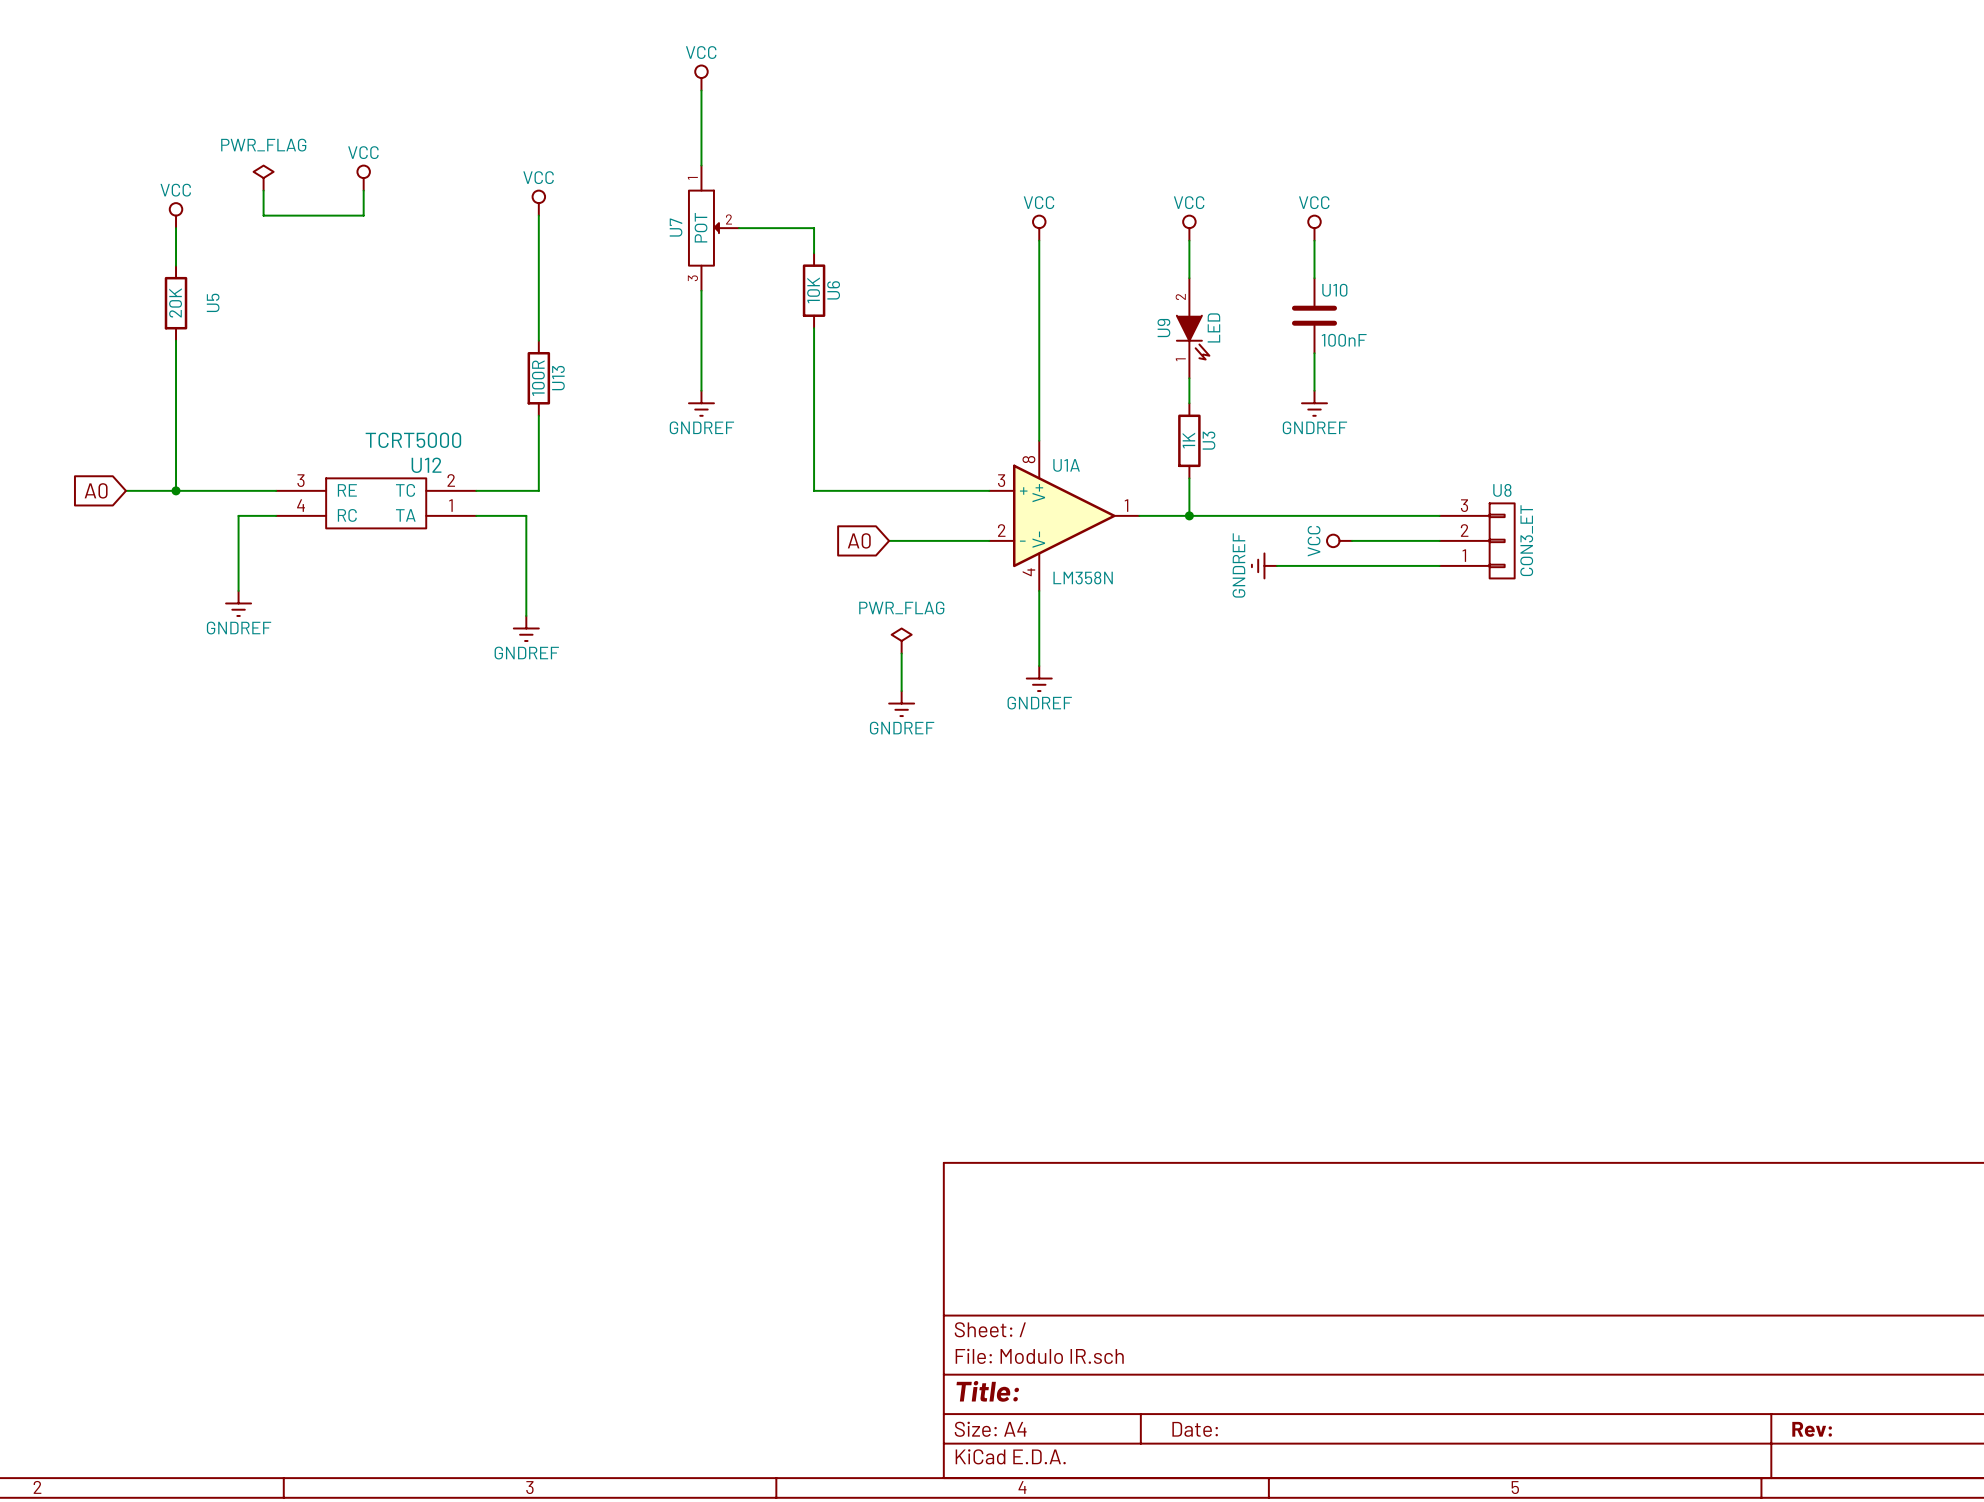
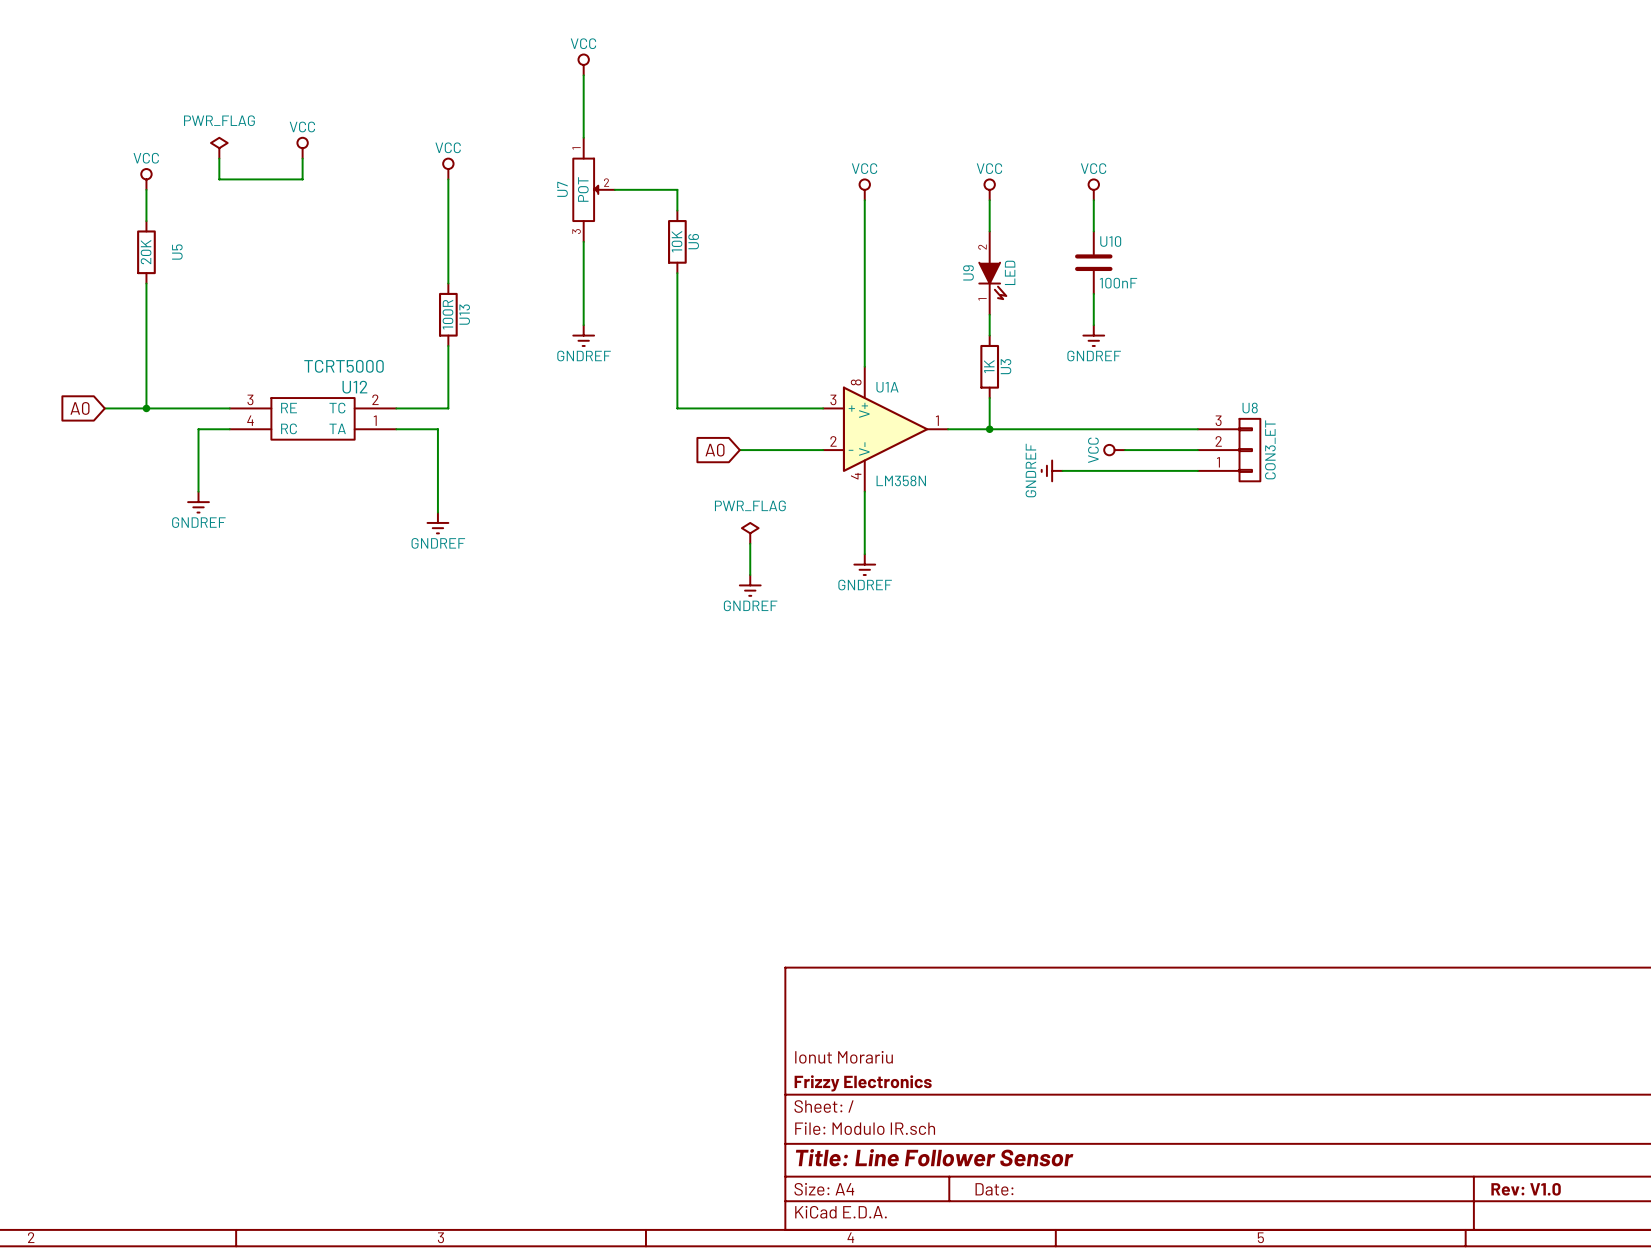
title block: none -> Ionut Morariu (844, 1057)
title block: none -> Frizzy Electronics (863, 1083)
title block: Title: (987, 1391) -> Title: Line Follower Sensor (934, 1157)
title block: Rev: (1812, 1429) -> Rev: V1.0 (1526, 1189)

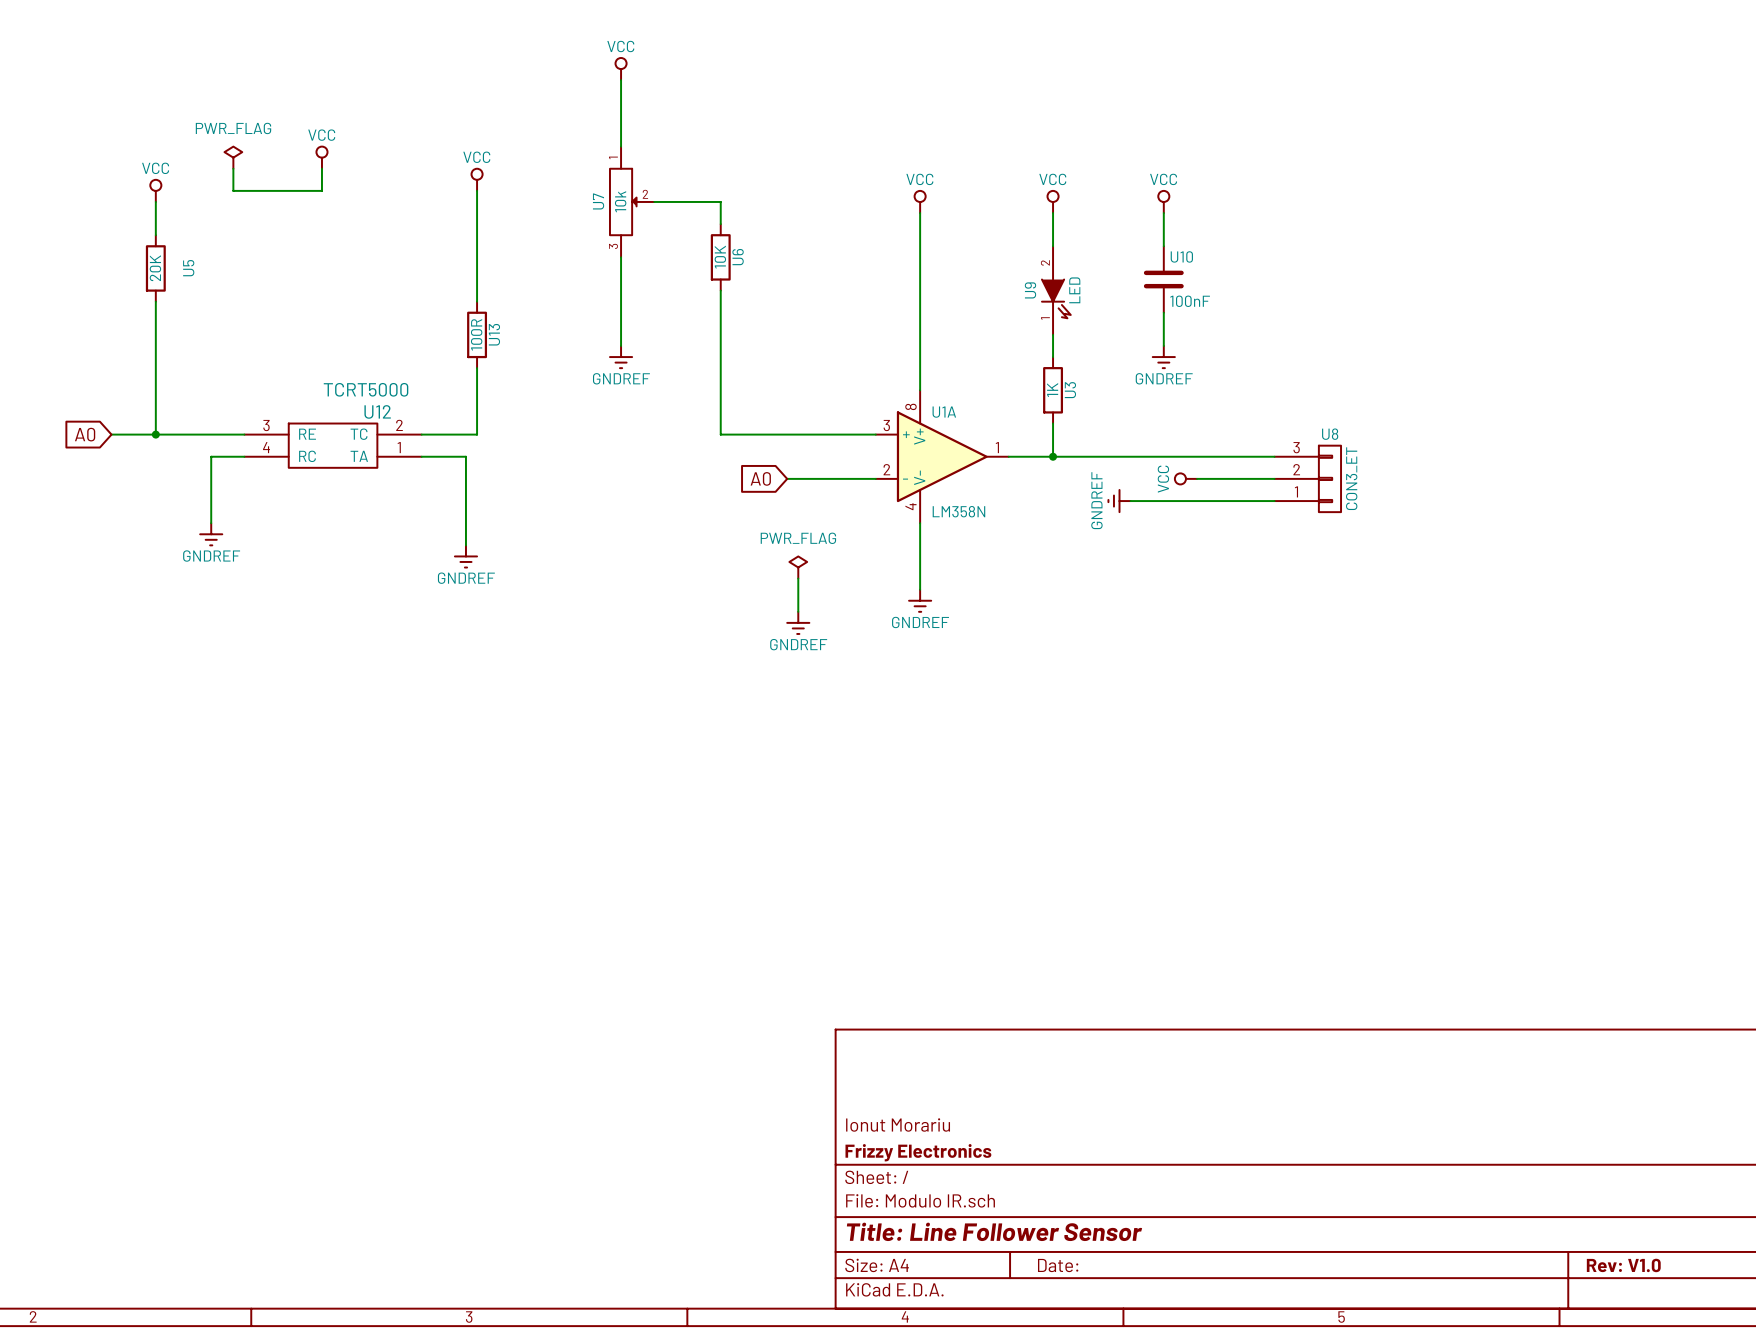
U7 value: POT (583, 189) -> 10k (620, 201)

